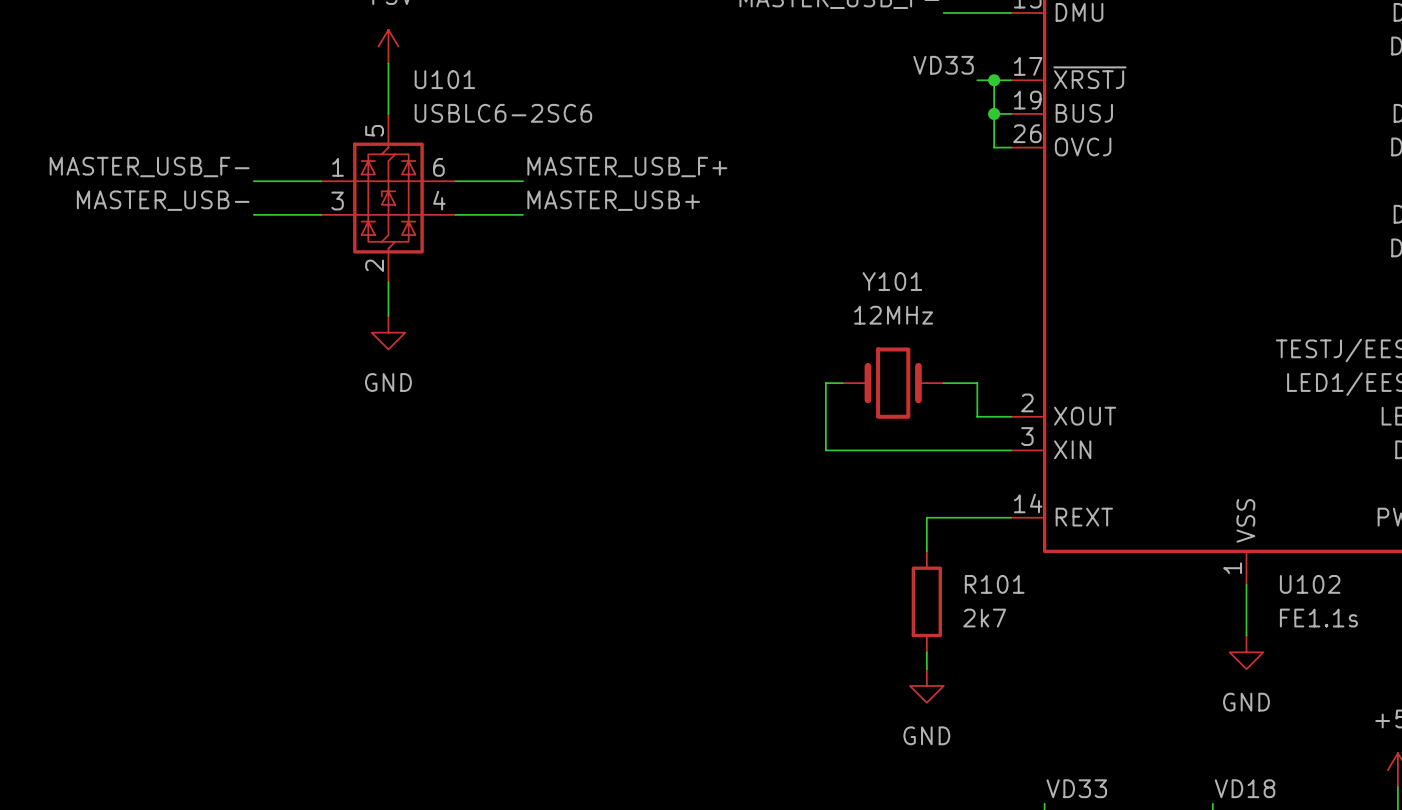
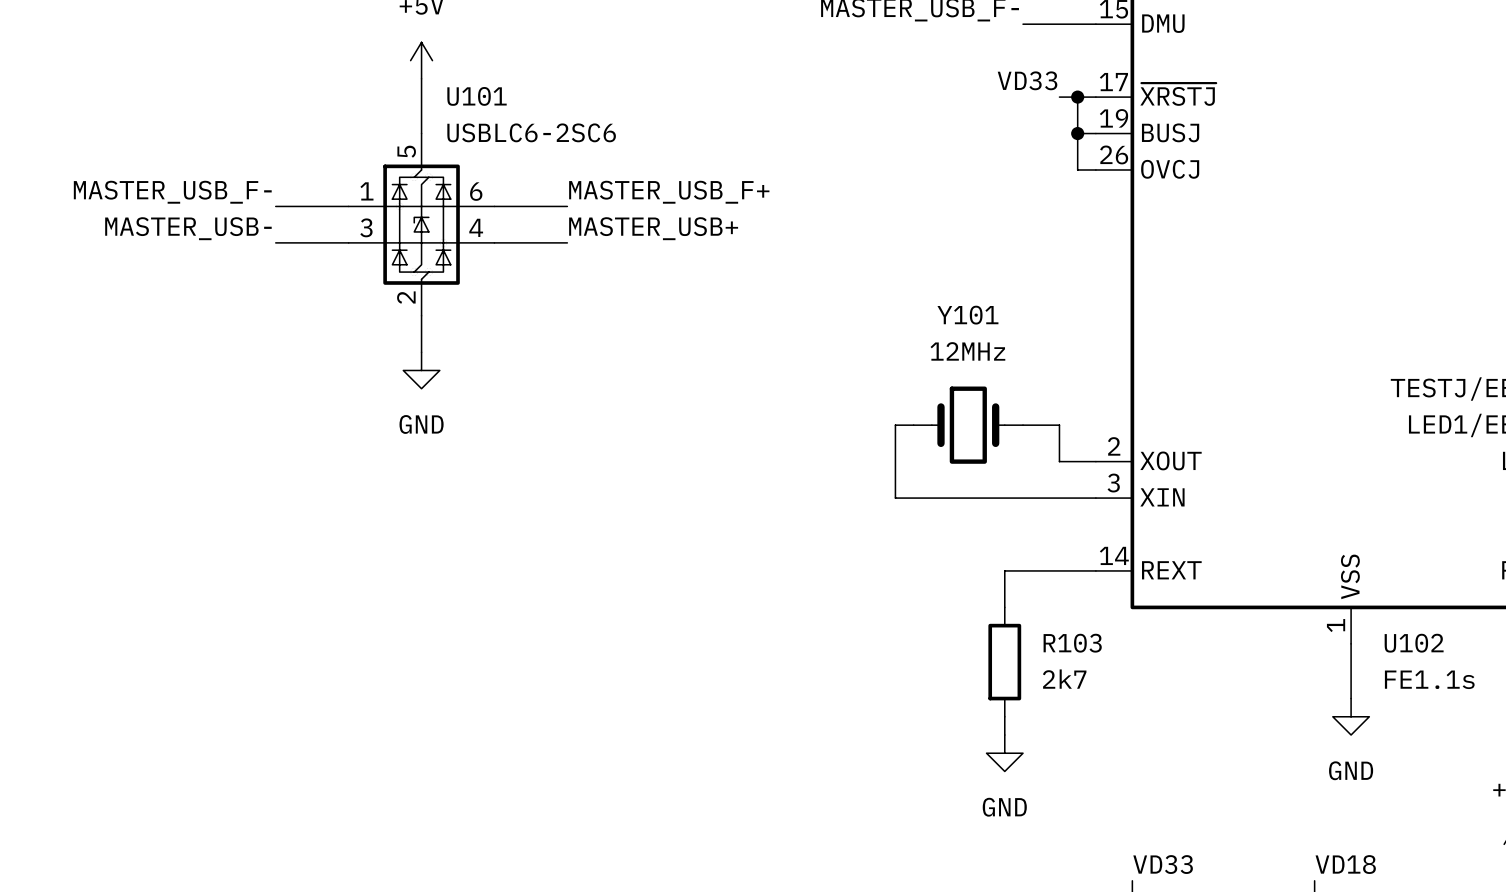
R101 name: R101 (994, 584) -> R103 (1072, 643)

